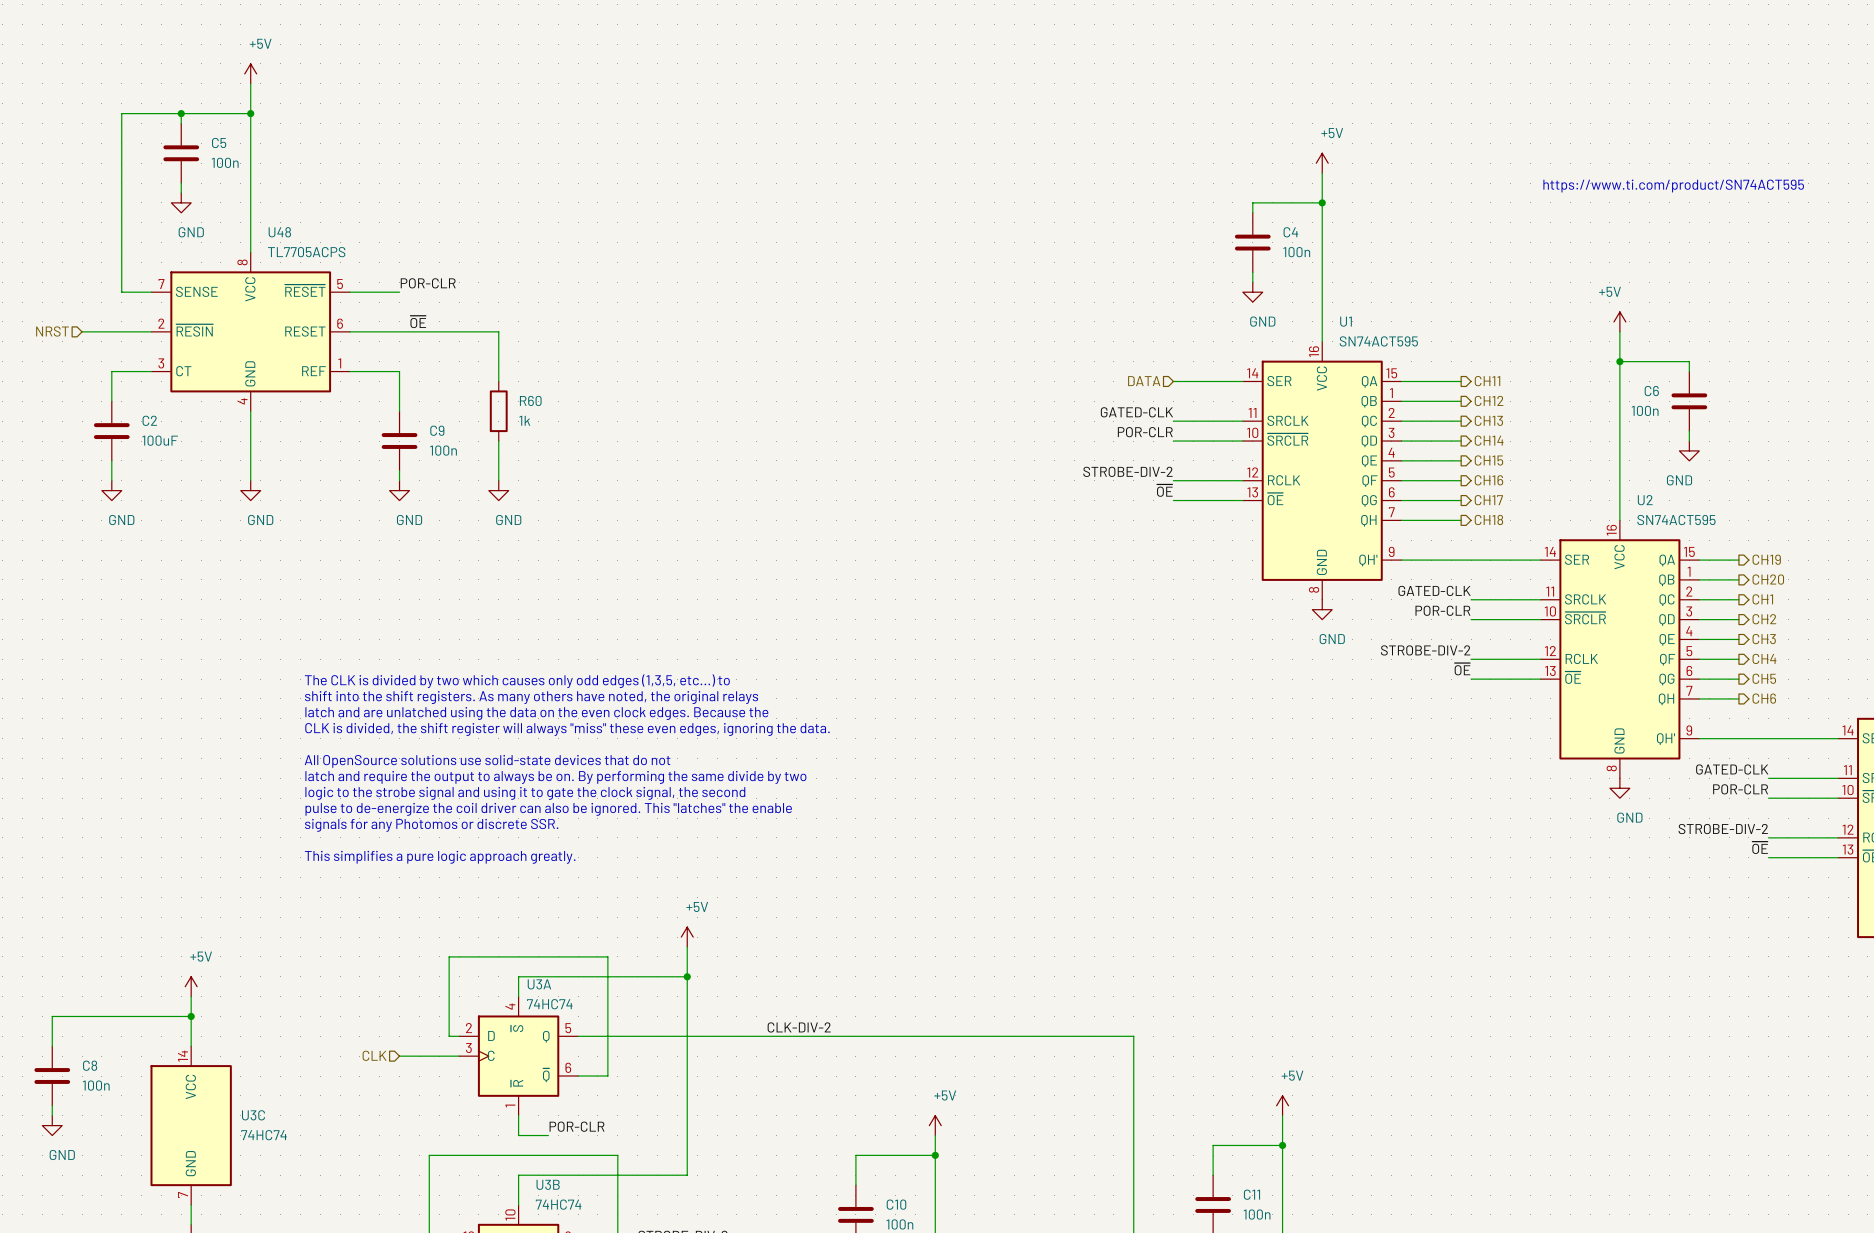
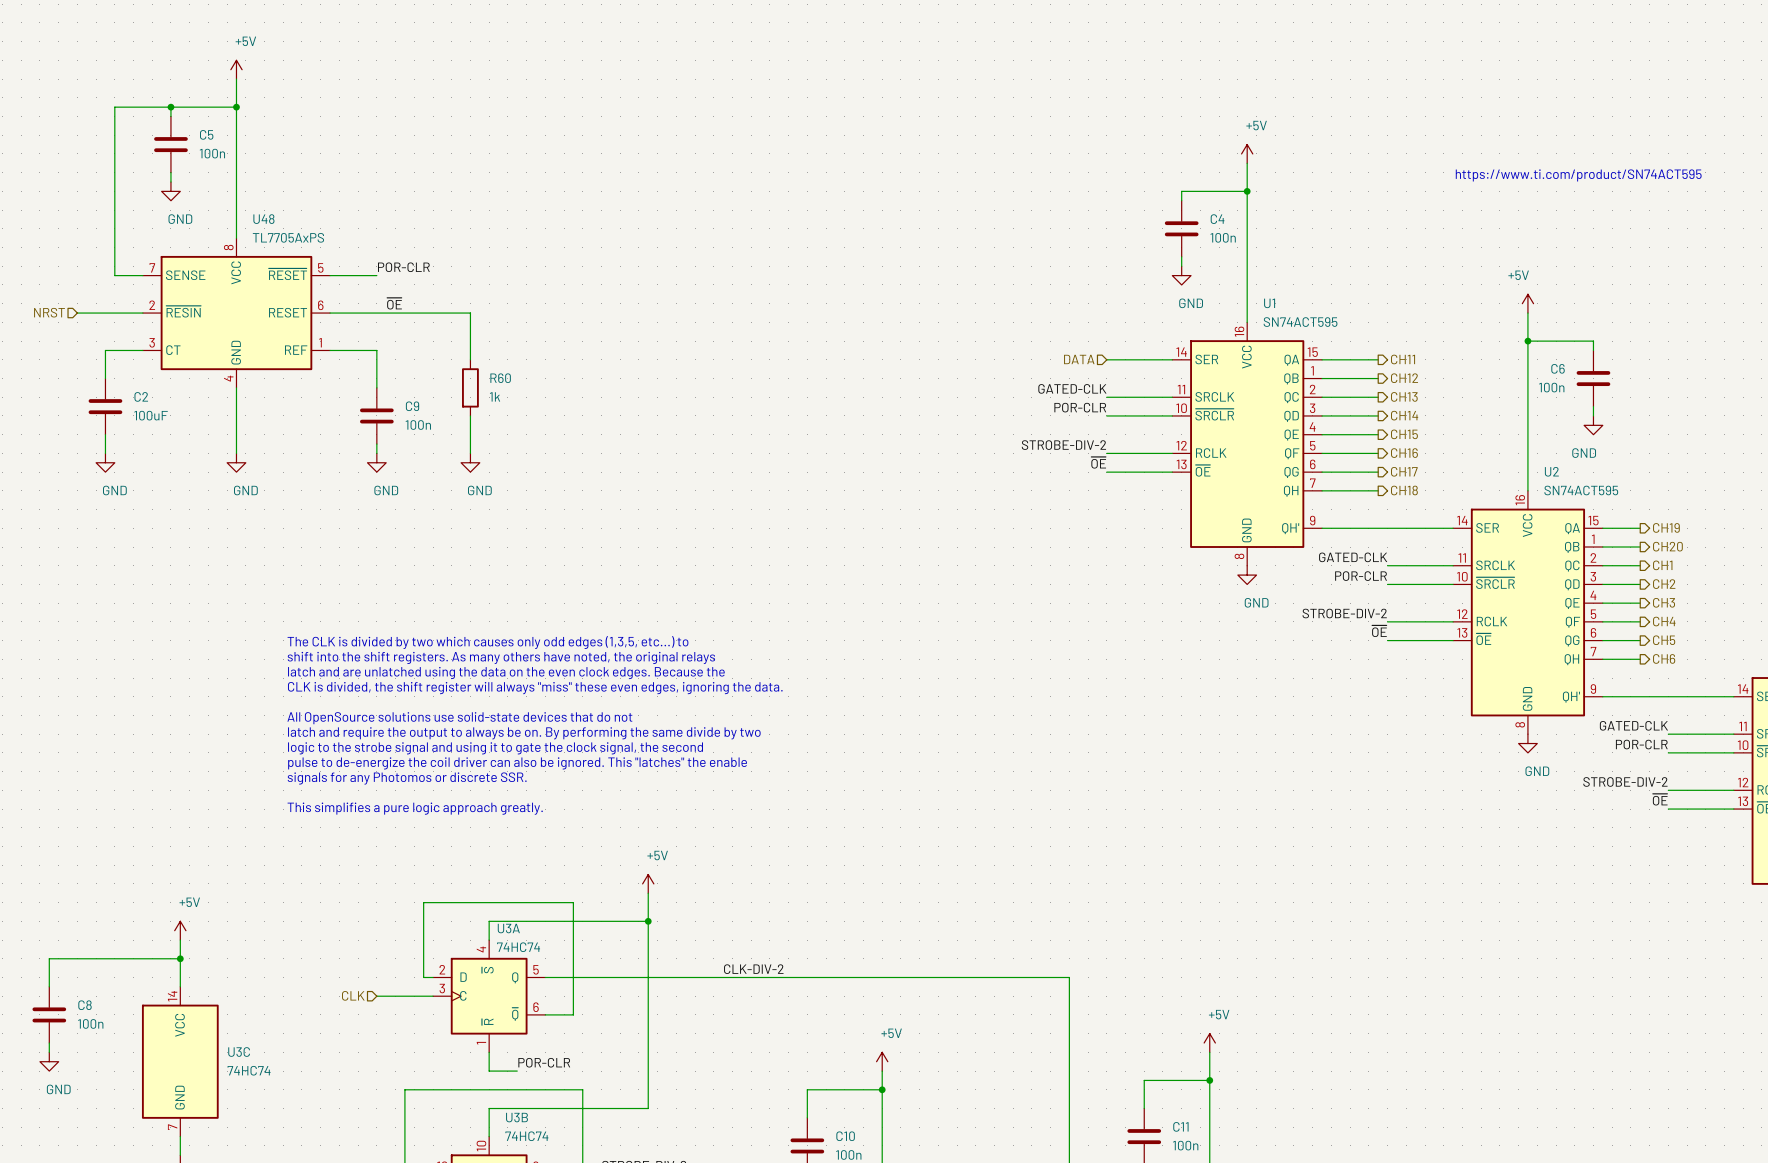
U48 value: TL7705ACPS (306, 252) -> TL7705AxPS (288, 237)

